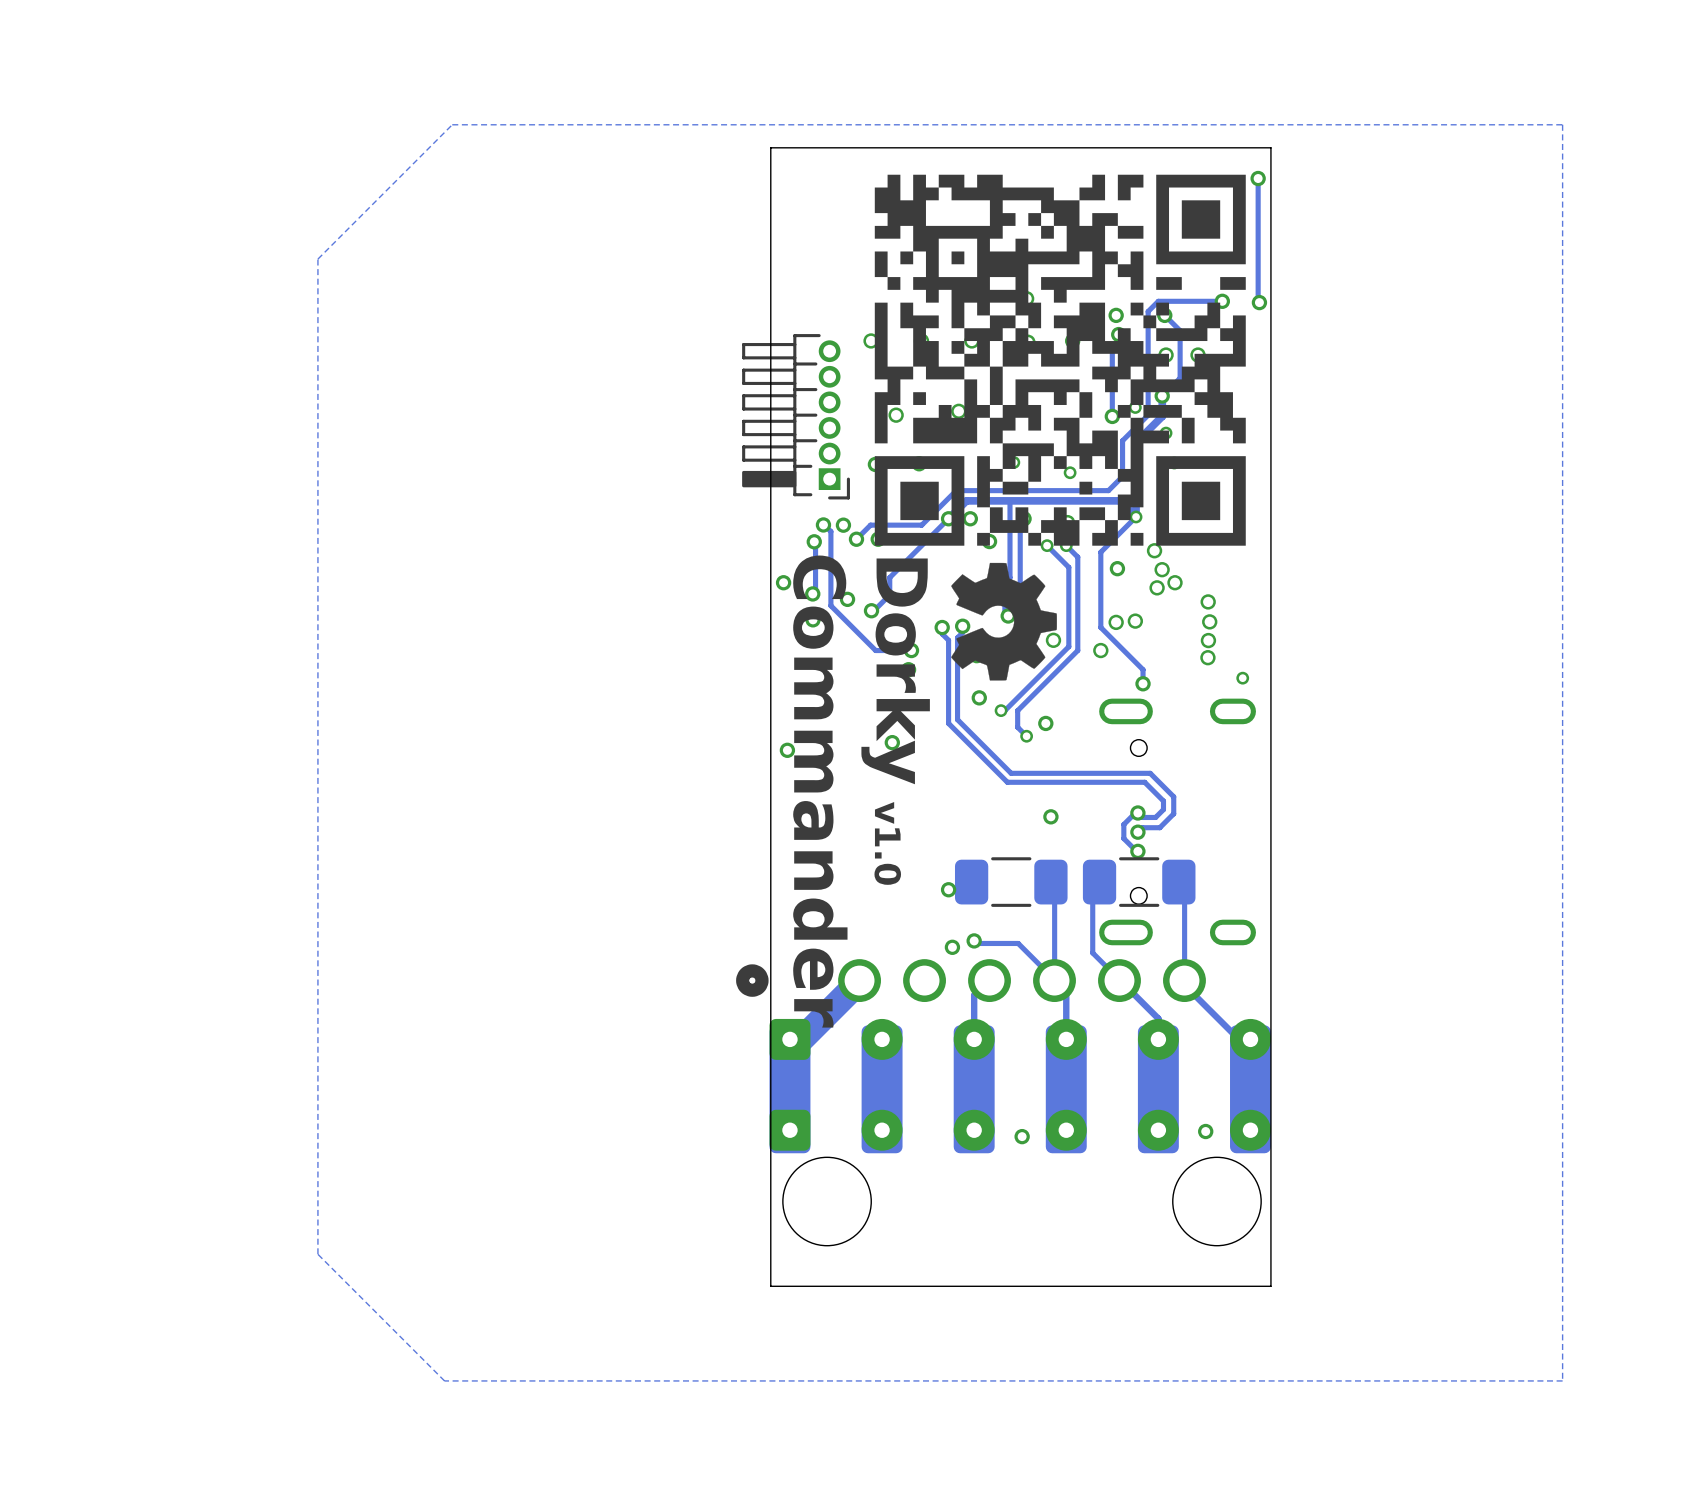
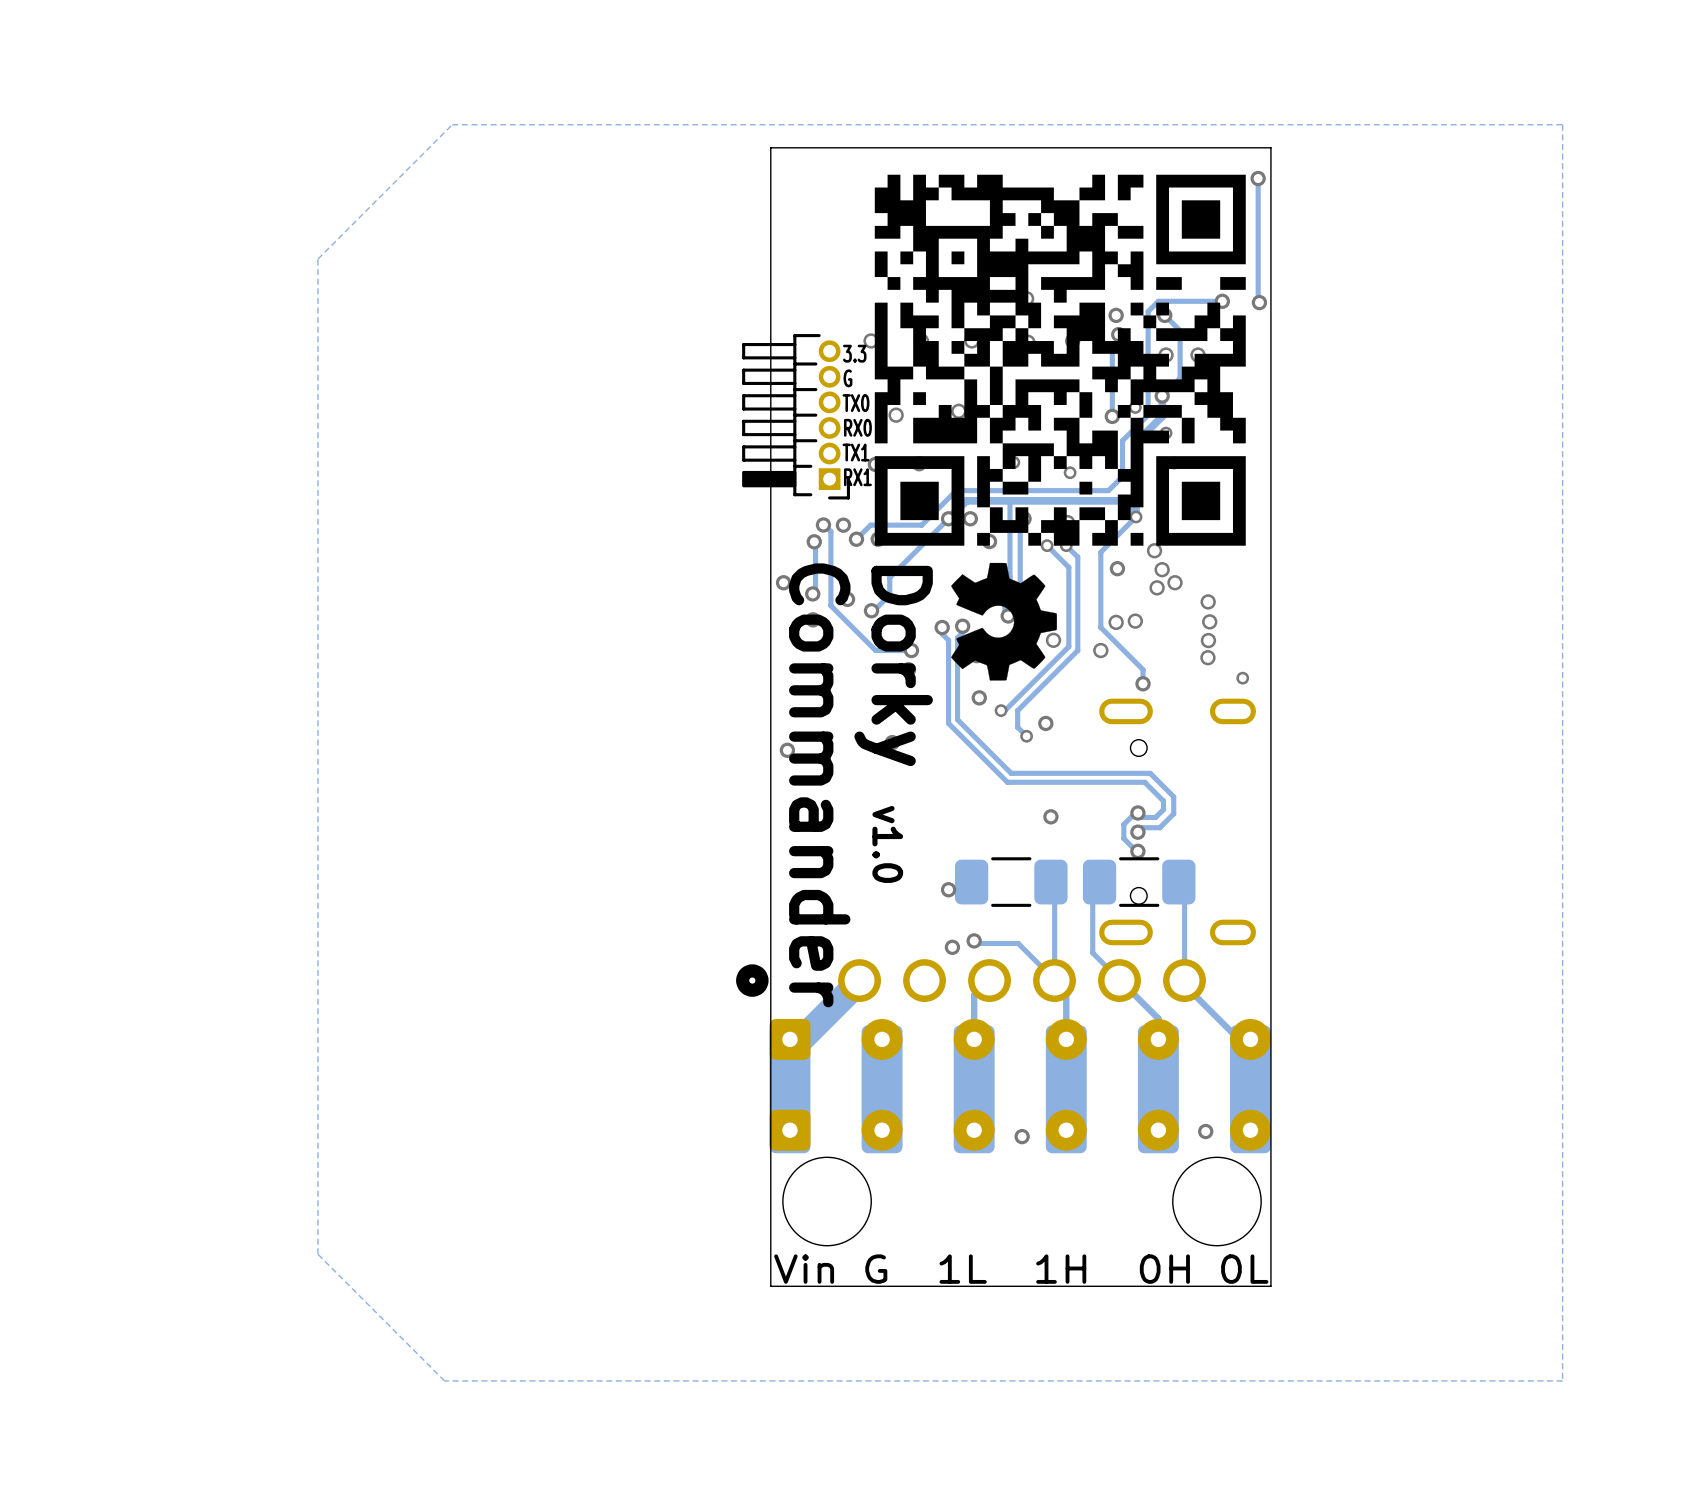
text: none -> 3.3 (854, 353)
text: none -> G (847, 378)
text: none -> TX0 (855, 403)
text: none -> RX0 (857, 427)
text: none -> TX1 (855, 452)
text: none -> RX1 (857, 477)
text: none -> Vin G 1L 1H 0H 0L (1021, 1269)

